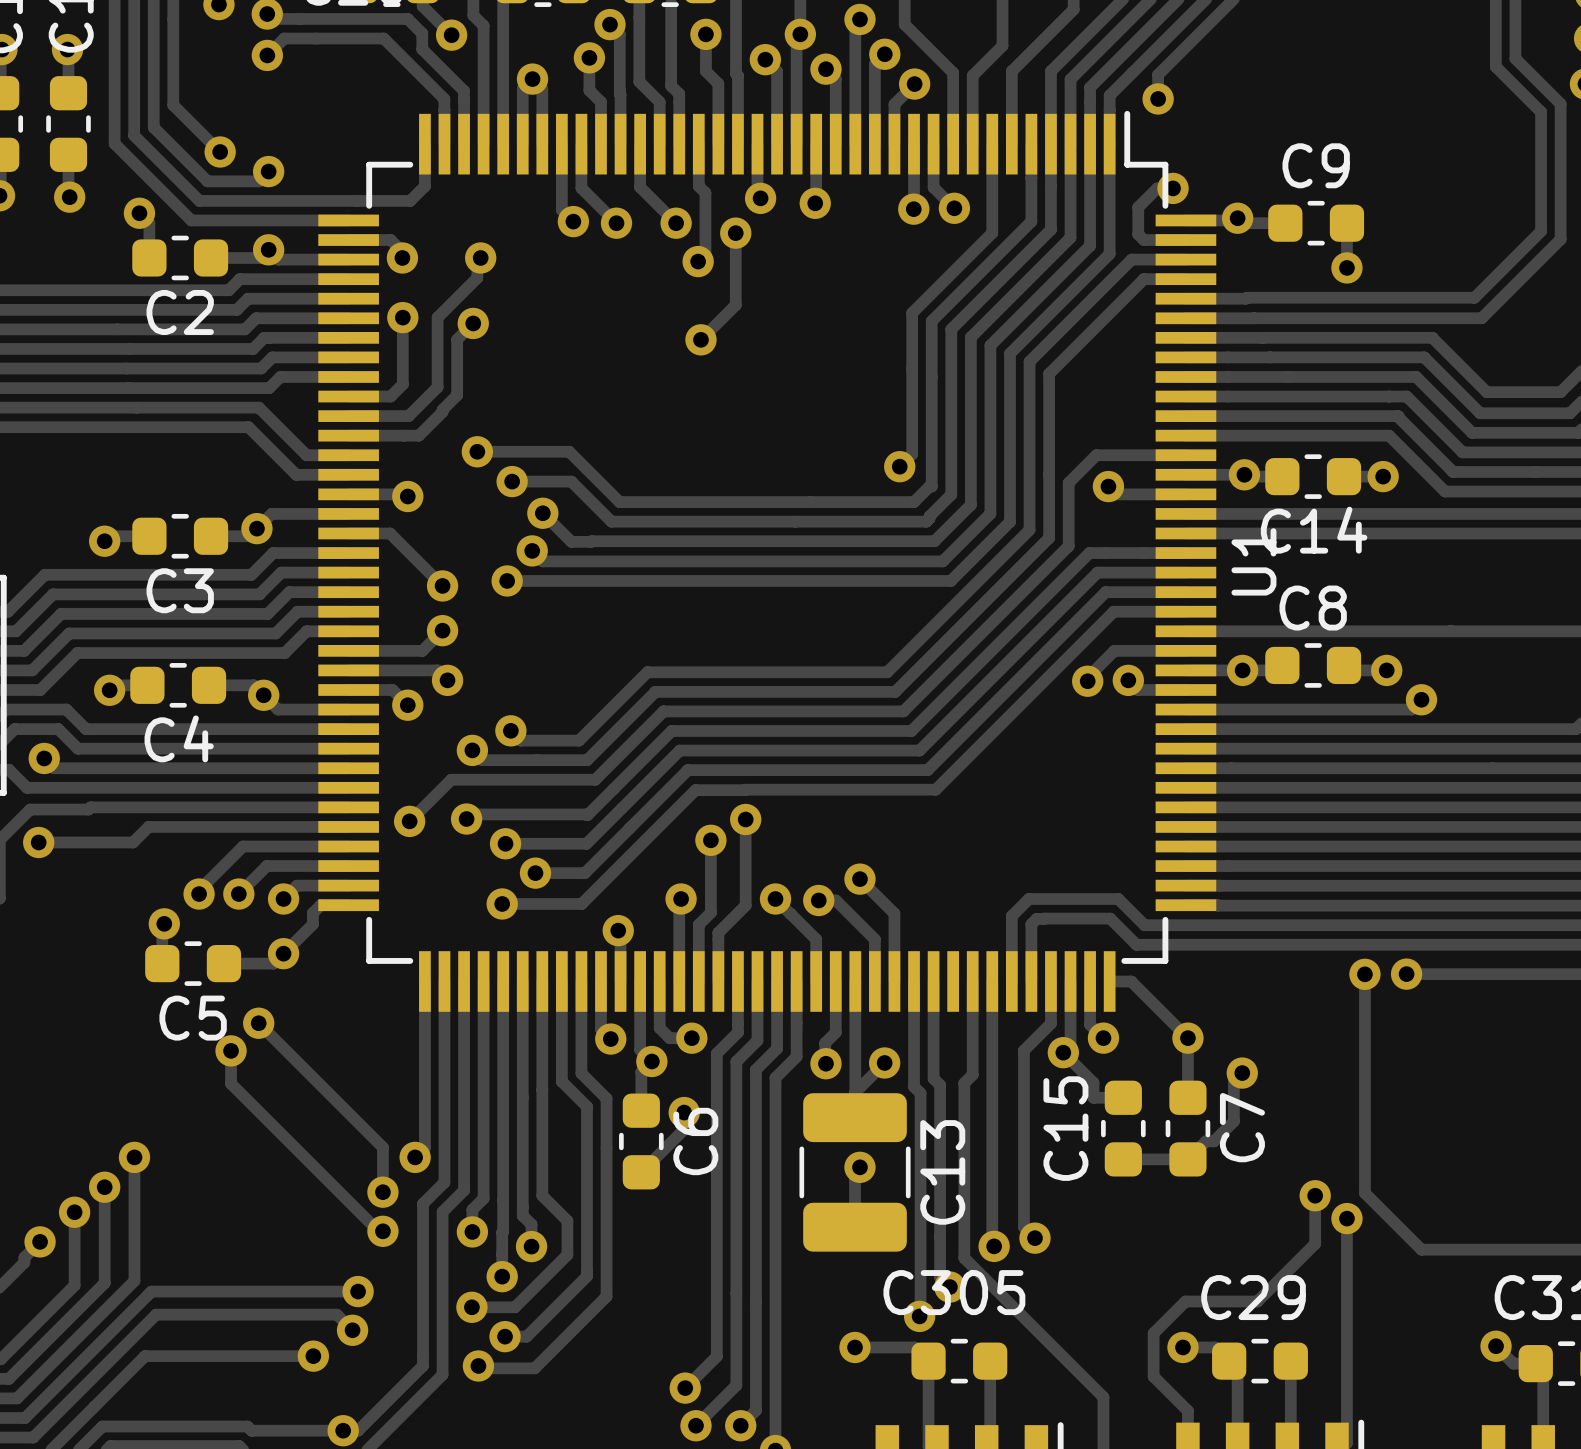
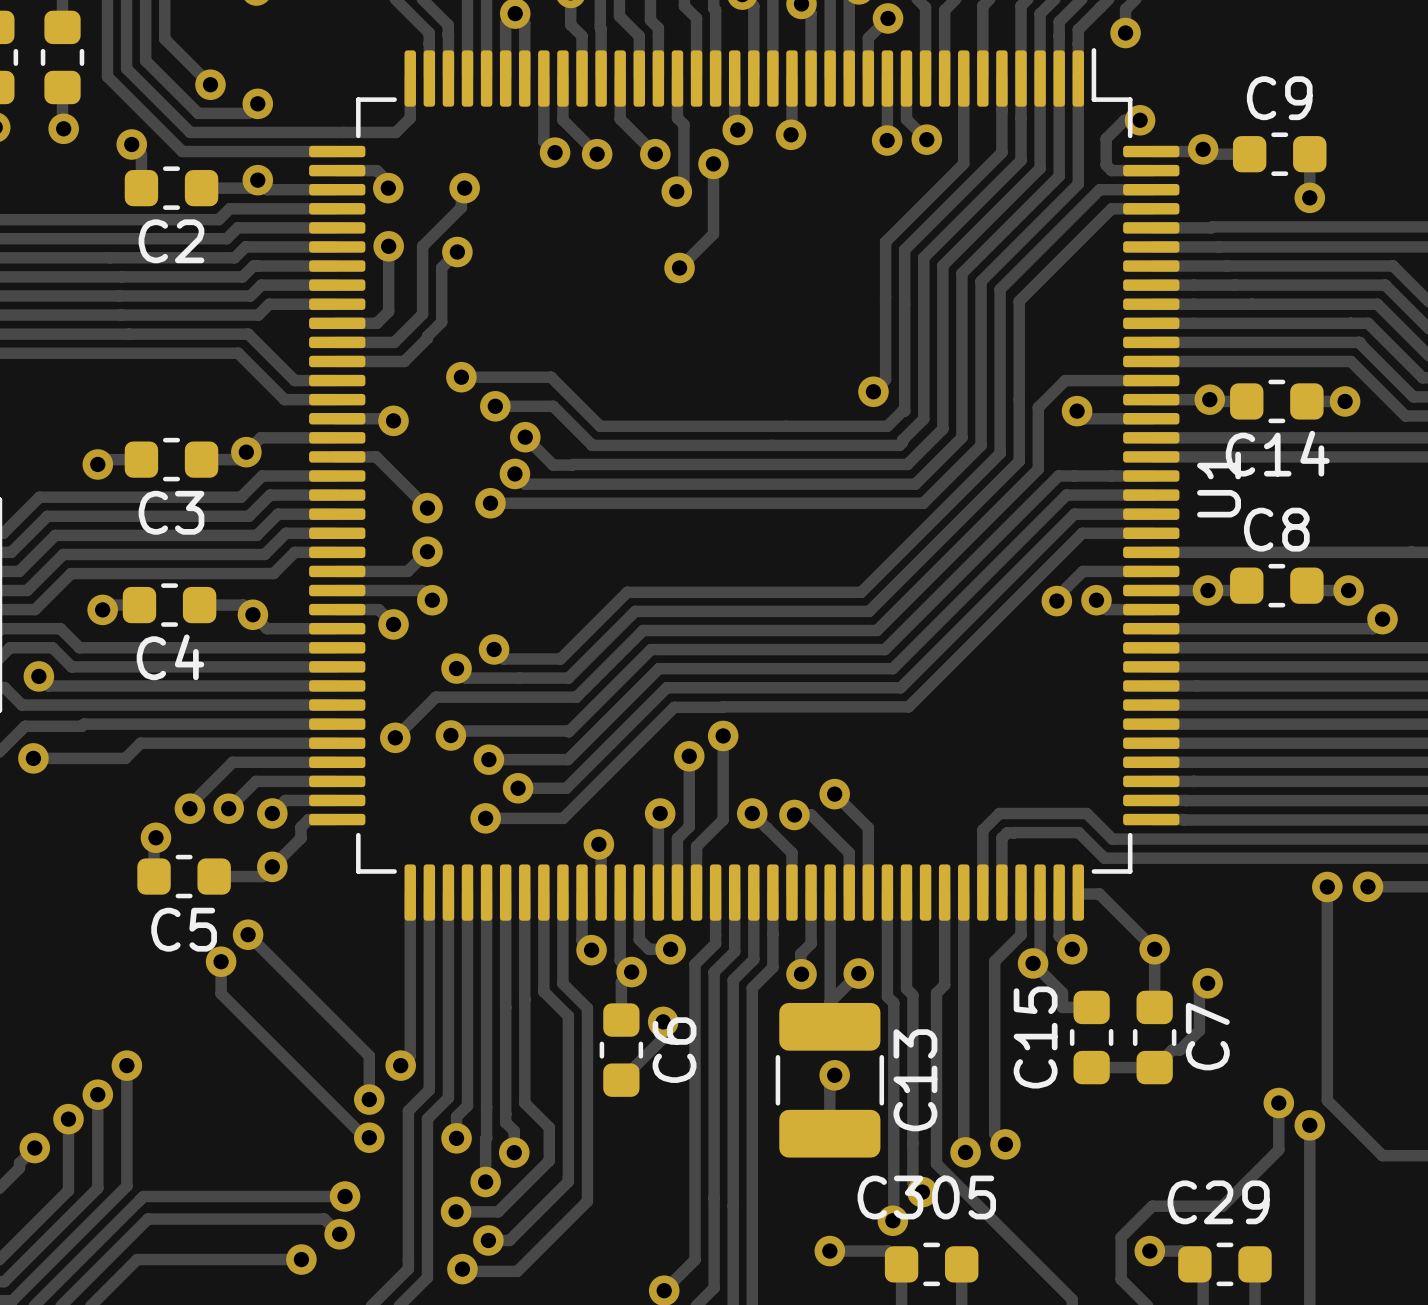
U1 footprint: [318, 110, 1217, 1012] -> [309, 48, 1180, 921]

